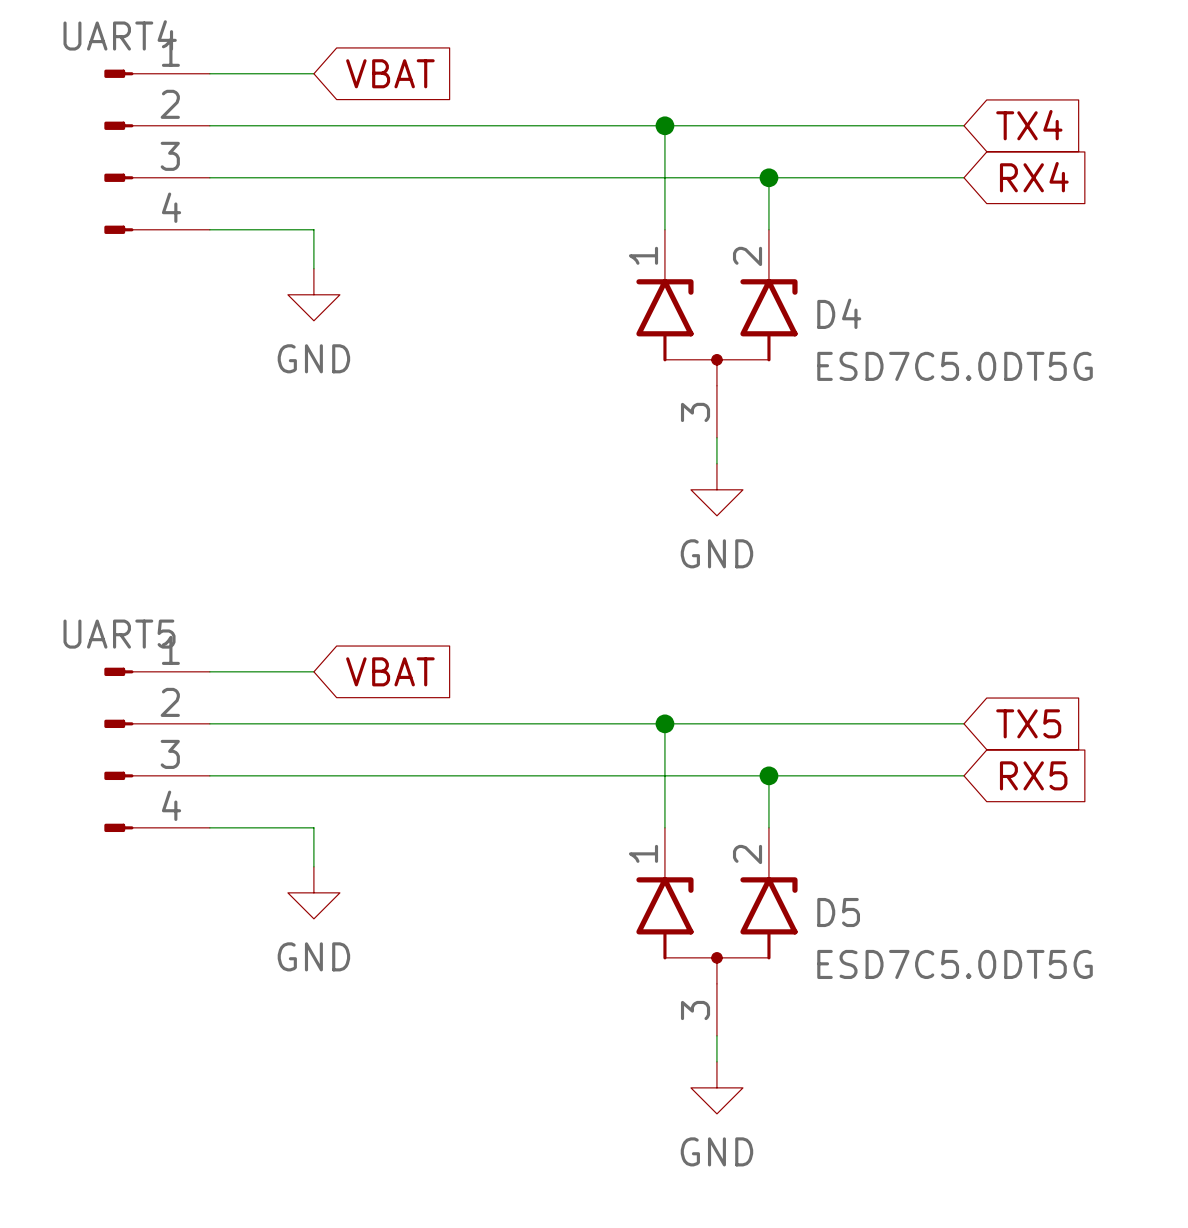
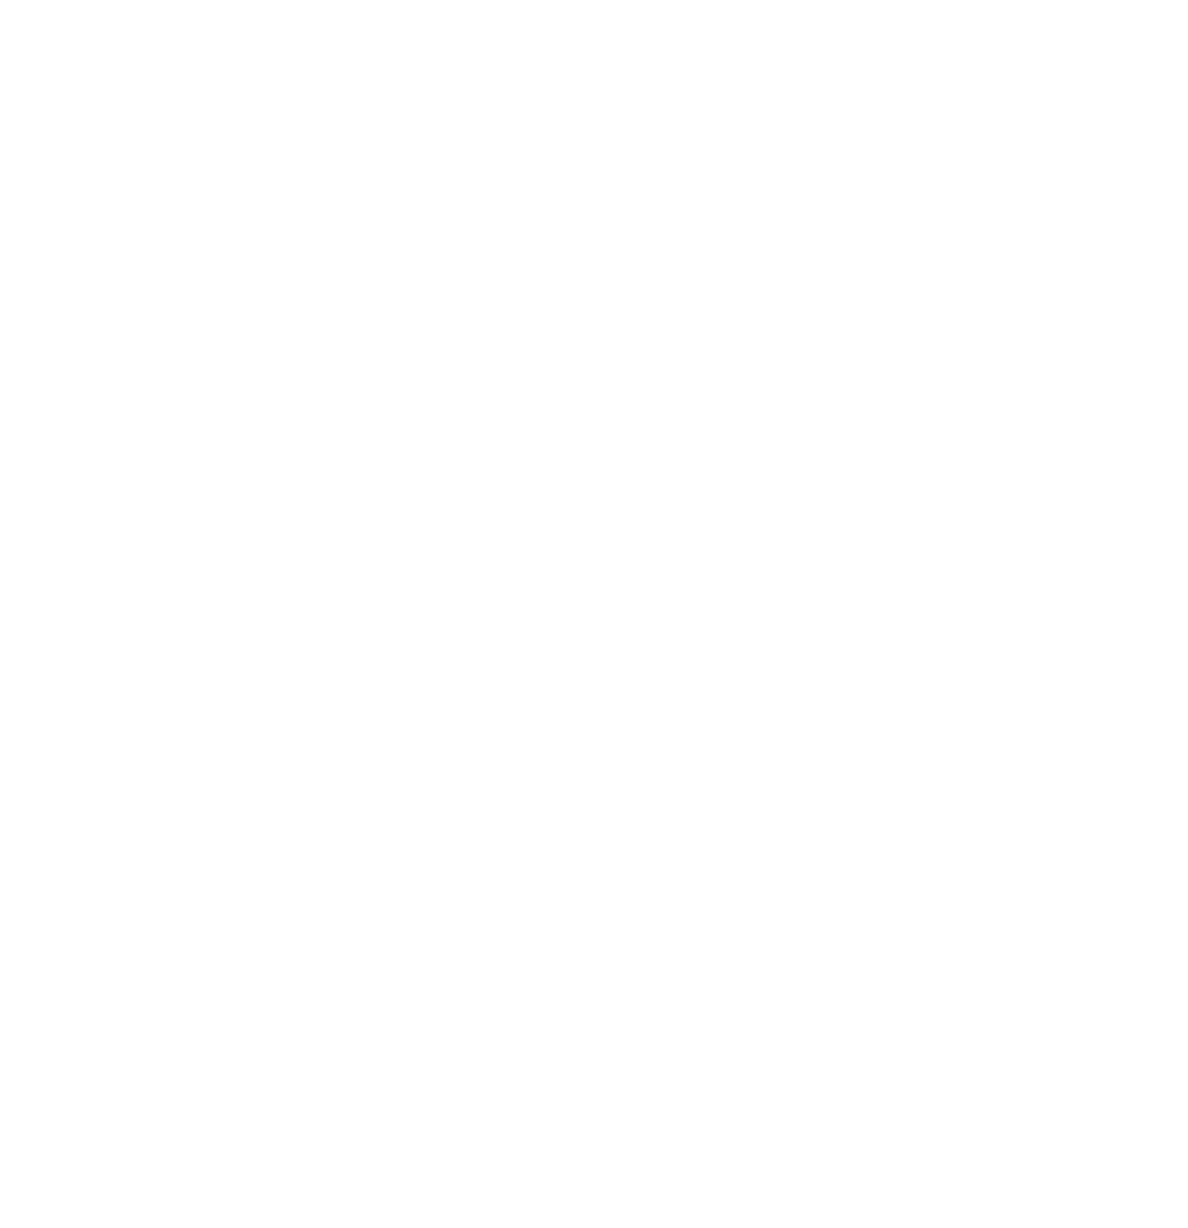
wire: (209, 73) (313, 73) -> none
global label: VBAT (390, 73) -> none
wire: (209, 125) (963, 125) -> none
wire: (664, 125) (664, 229) -> none
junction: (664, 125) -> none
global label: TX4 (1029, 125) -> none
UART4: (157, 151) -> none
wire: (209, 177) (963, 177) -> none
wire: (768, 177) (768, 229) -> none
junction: (768, 177) -> none
global label: RX4 (1034, 177) -> none
wire: (209, 229) (313, 229) (313, 268) -> none
power symbol: GND (313, 294) -> none
D4: ESD7C5.0DT5G (716, 333) -> none
wire: (716, 437) (716, 463) -> none
power symbol: GND (716, 489) -> none
wire: (209, 671) (313, 671) -> none
global label: VBAT (390, 671) -> none
wire: (209, 723) (963, 723) -> none
wire: (664, 723) (664, 827) -> none
junction: (664, 723) -> none
global label: TX5 (1028, 723) -> none
UART5: (157, 749) -> none
wire: (209, 775) (963, 775) -> none
wire: (768, 775) (768, 827) -> none
junction: (768, 775) -> none
global label: RX5 (1033, 775) -> none
wire: (209, 827) (313, 827) (313, 866) -> none
power symbol: GND (313, 892) -> none
D5: ESD7C5.0DT5G (716, 931) -> none
wire: (716, 1035) (716, 1061) -> none
power symbol: GND (716, 1087) -> none

